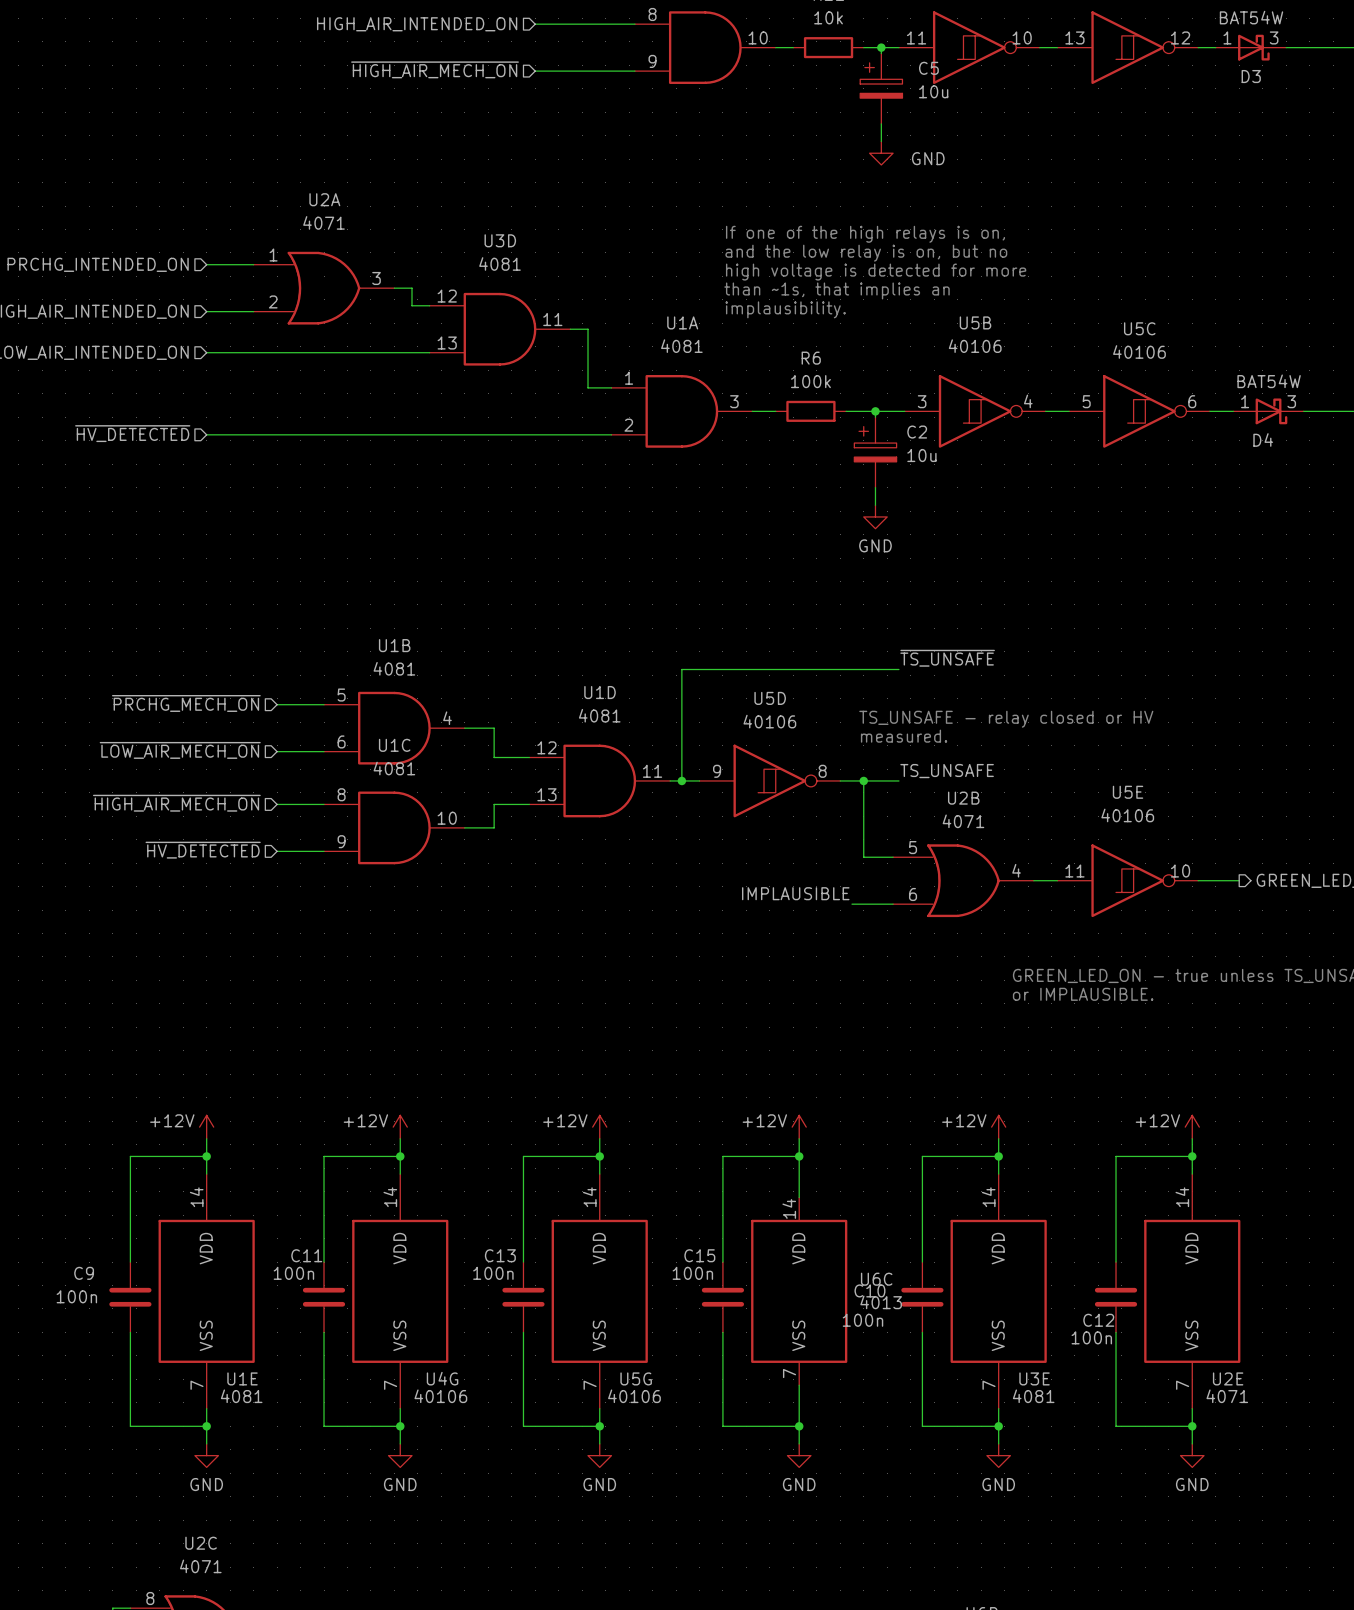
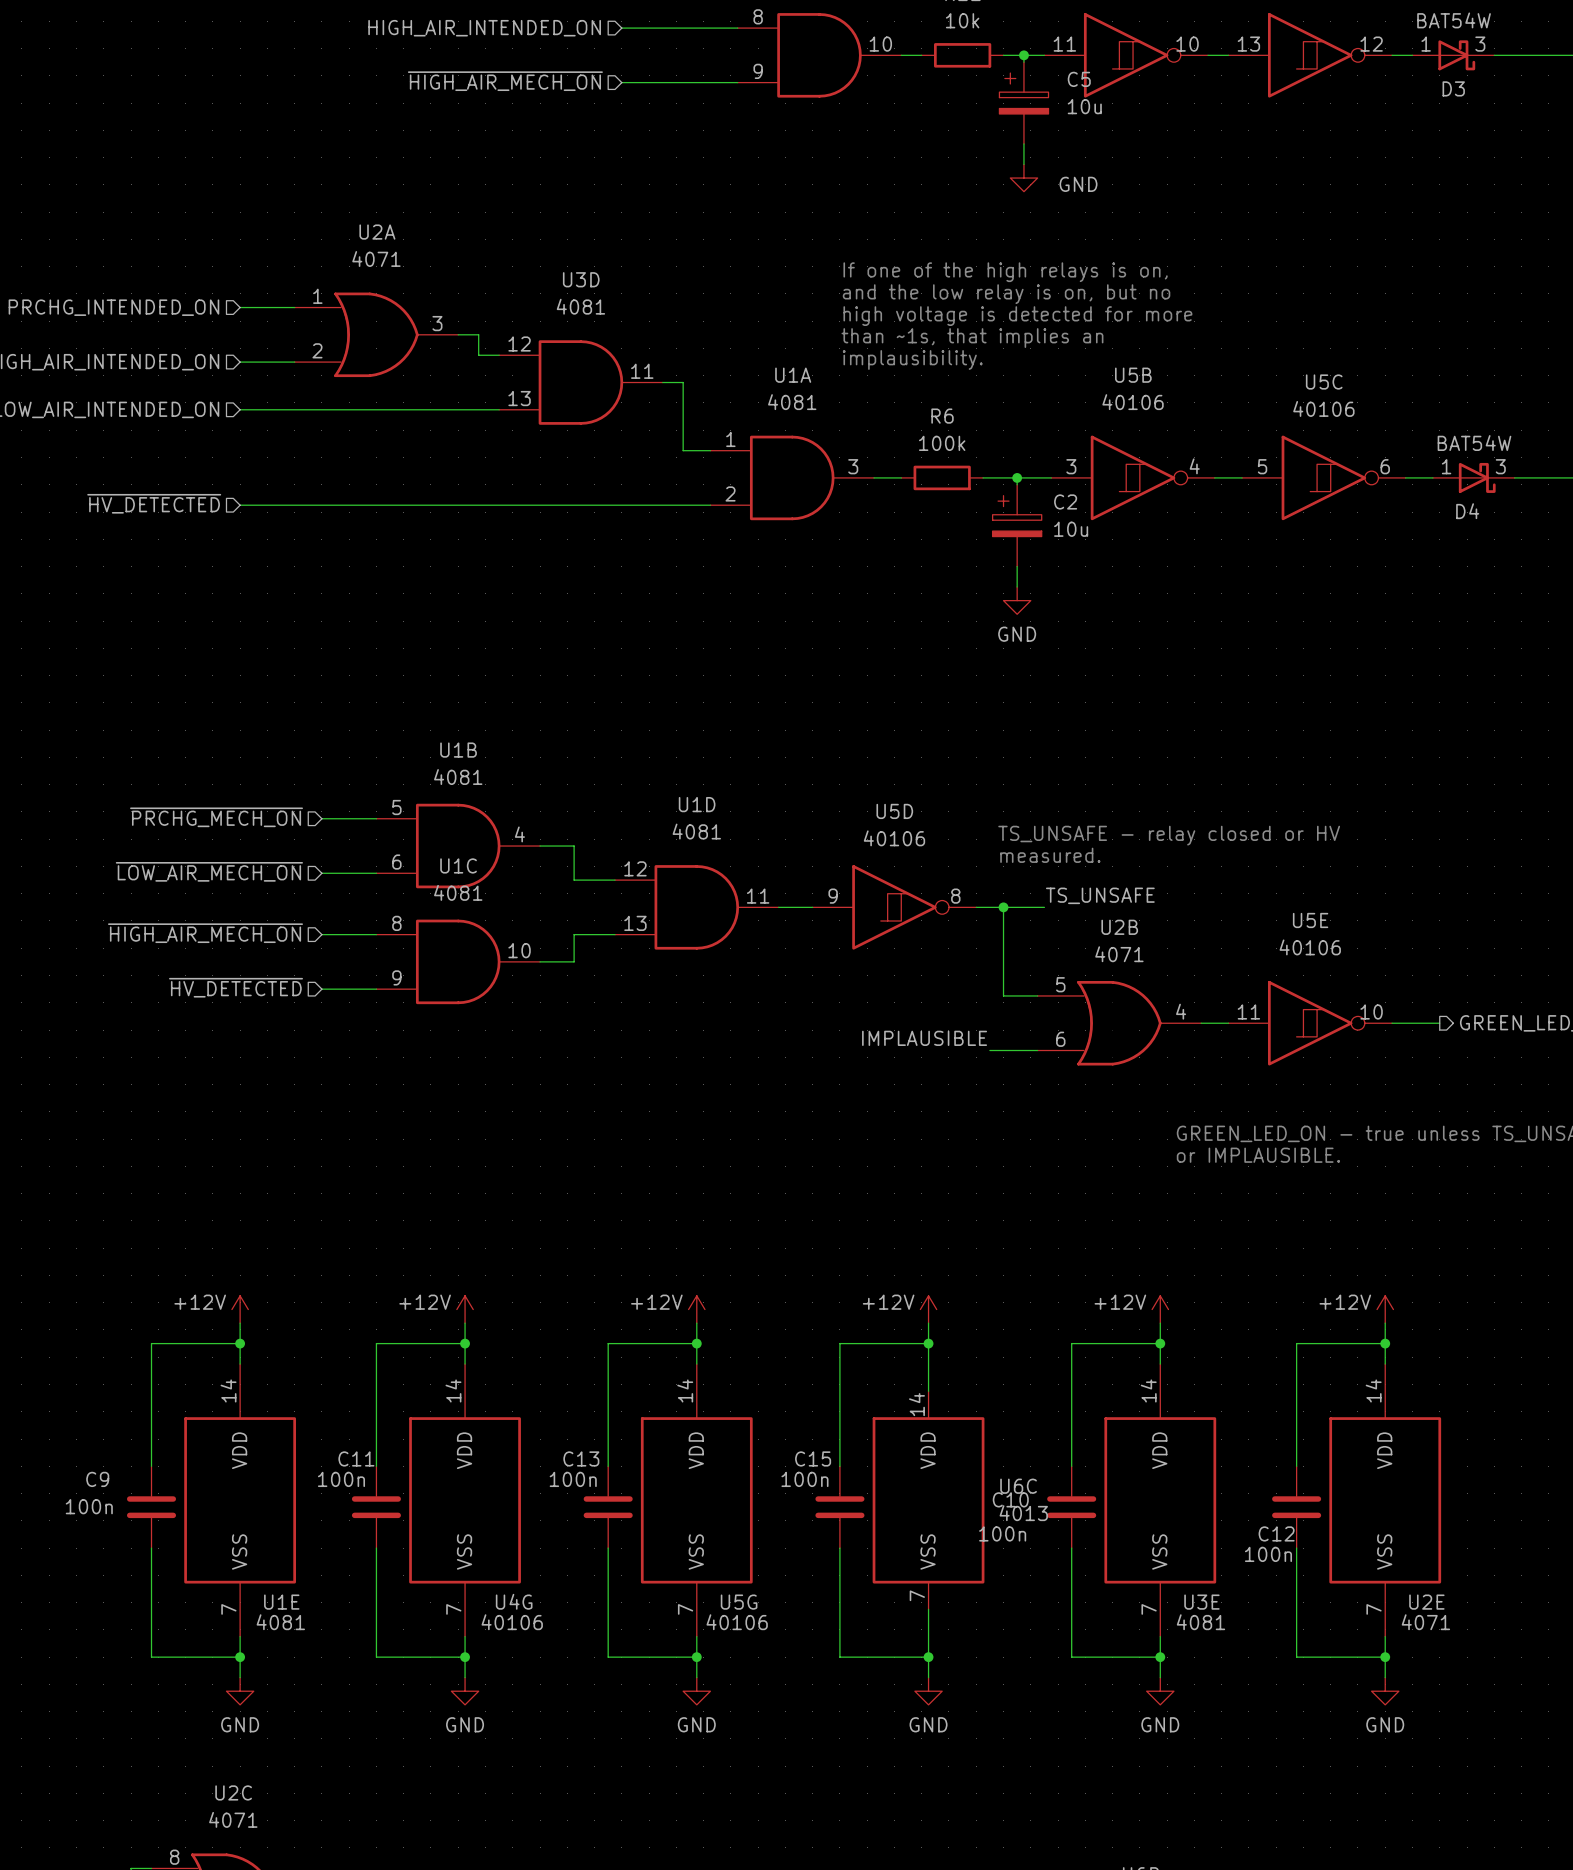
label: ~{TS_UNSAFE} (947, 658) -> none
wire: (898, 669) (681, 669) (681, 780) -> none
junction: (681, 780) -> none

